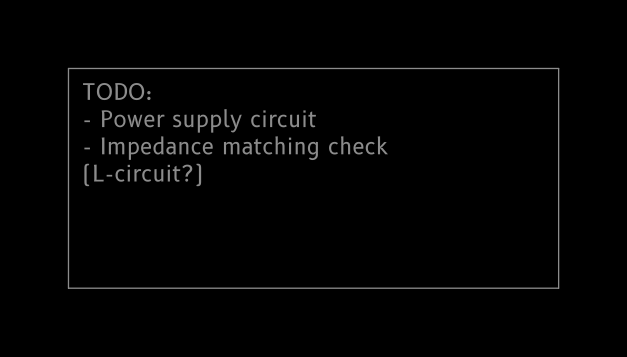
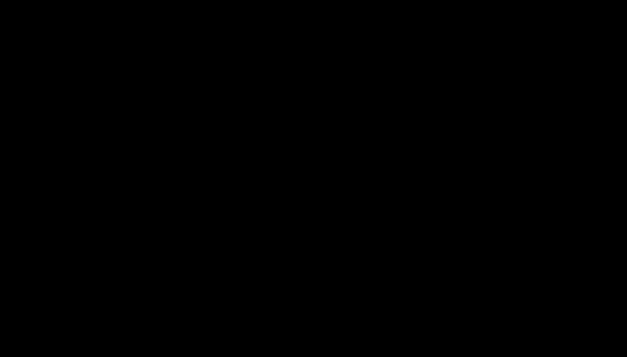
line: (68, 68) (558, 68) (558, 288) (68, 288) (68, 68) -> none
text: TODO: (116, 91) -> none
text: - Power supply circuit (200, 120) -> none
text: - Impedance matching check (236, 148) -> none
text: (L-circuit?) (142, 174) -> none

